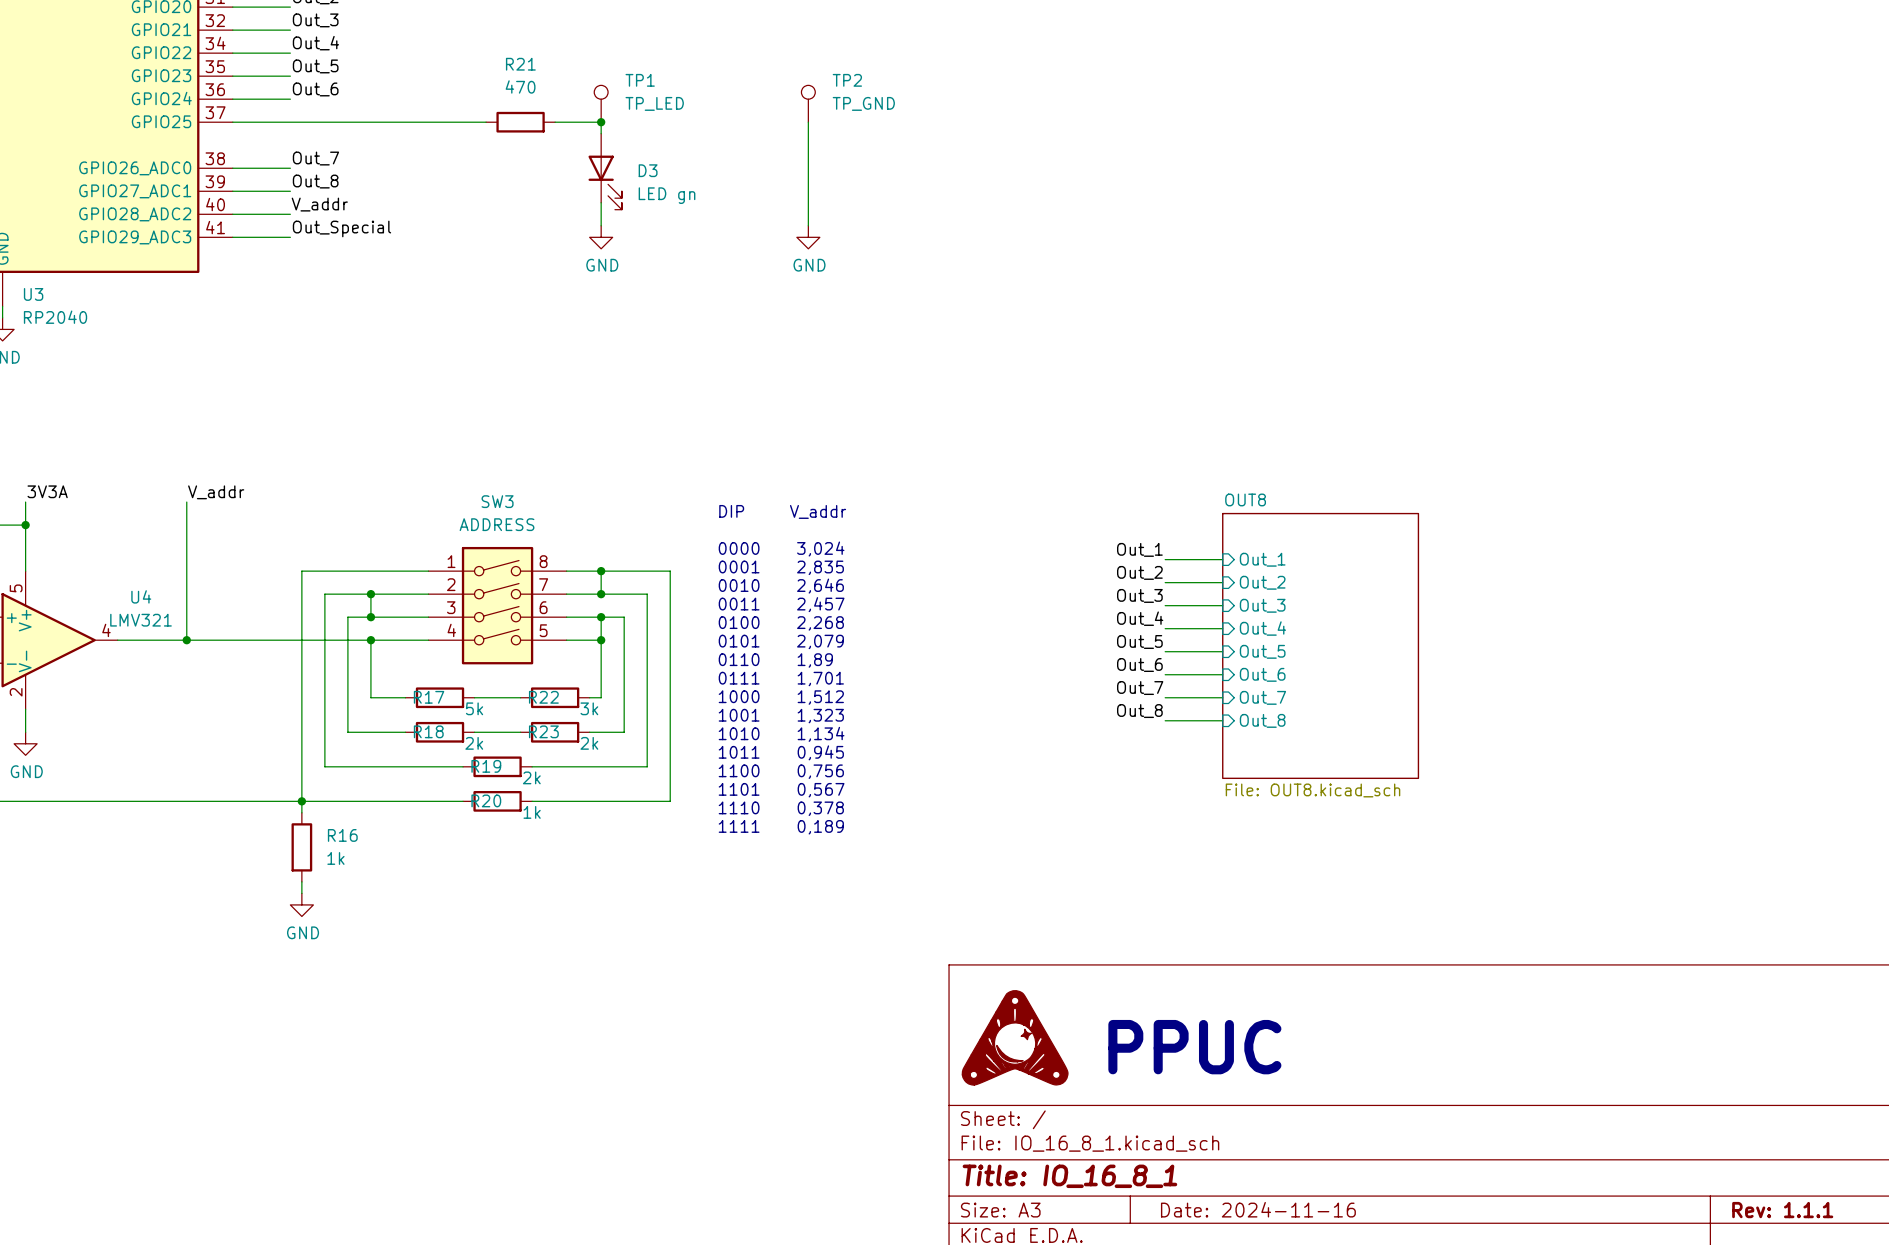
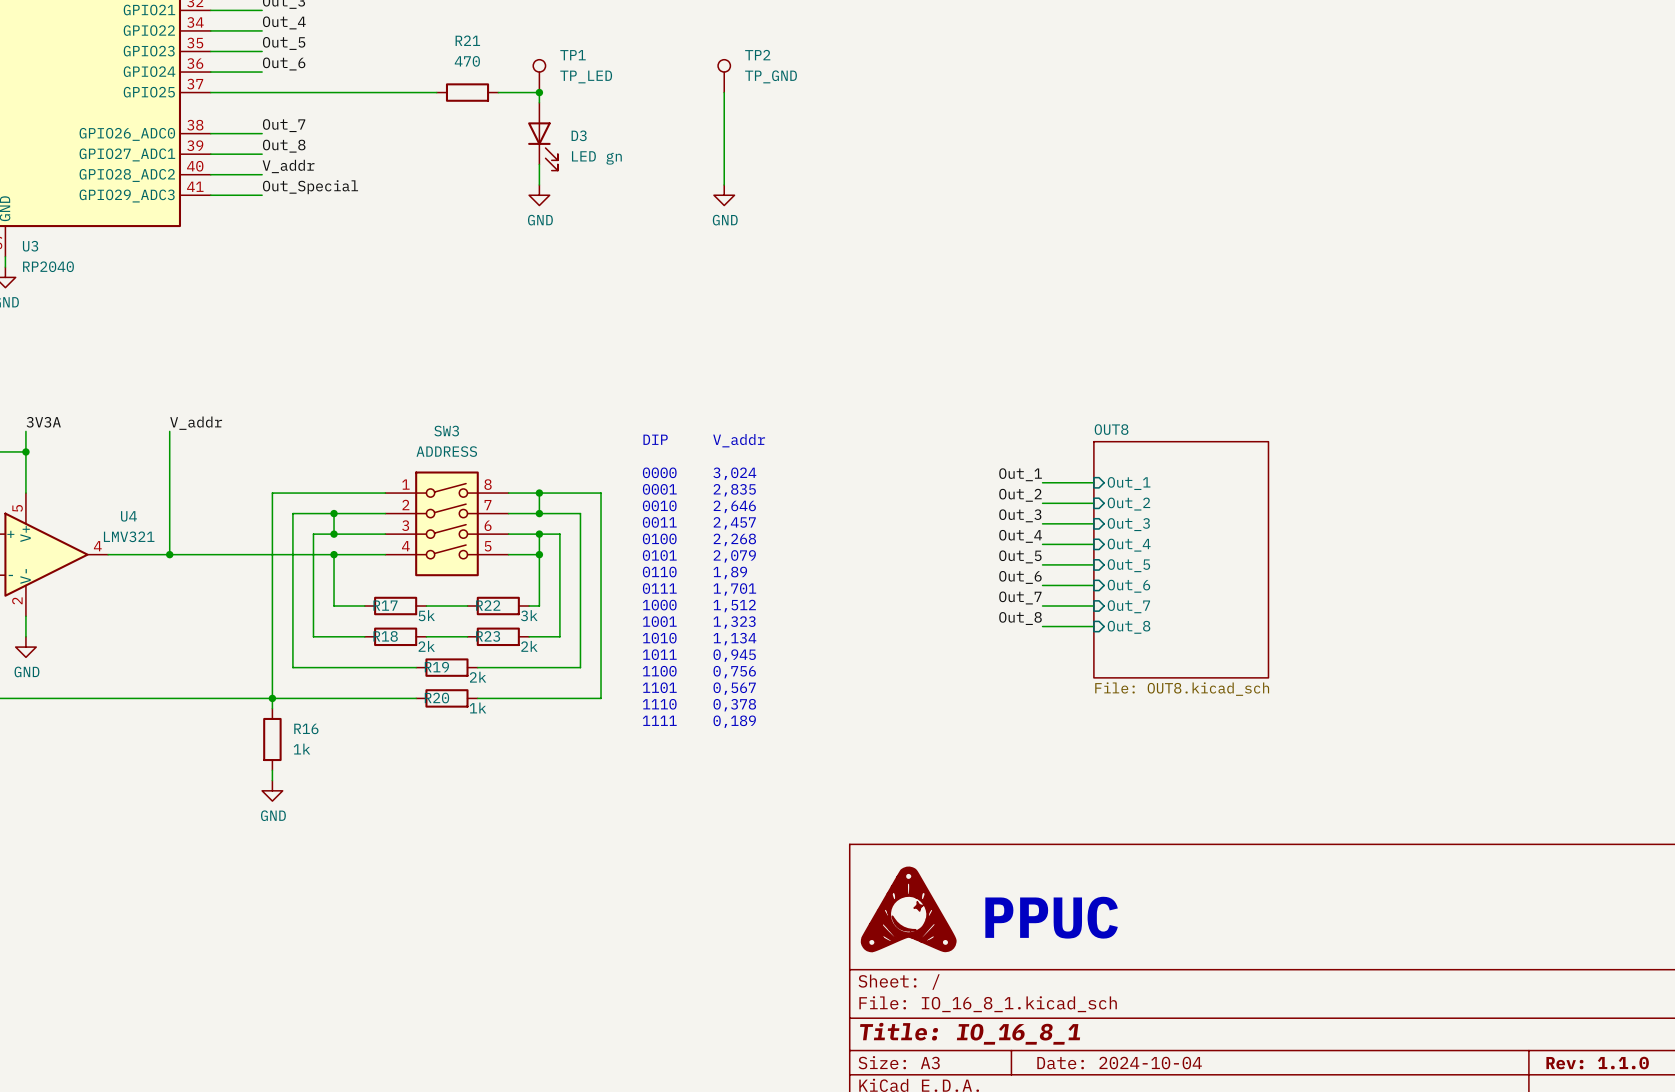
title block: Date: 2024-11-16 (1258, 1209) -> Date: 2024-10-04 (1119, 1063)
title block: Rev: 1.1.1 (1782, 1210) -> Rev: 1.1.0 (1597, 1063)

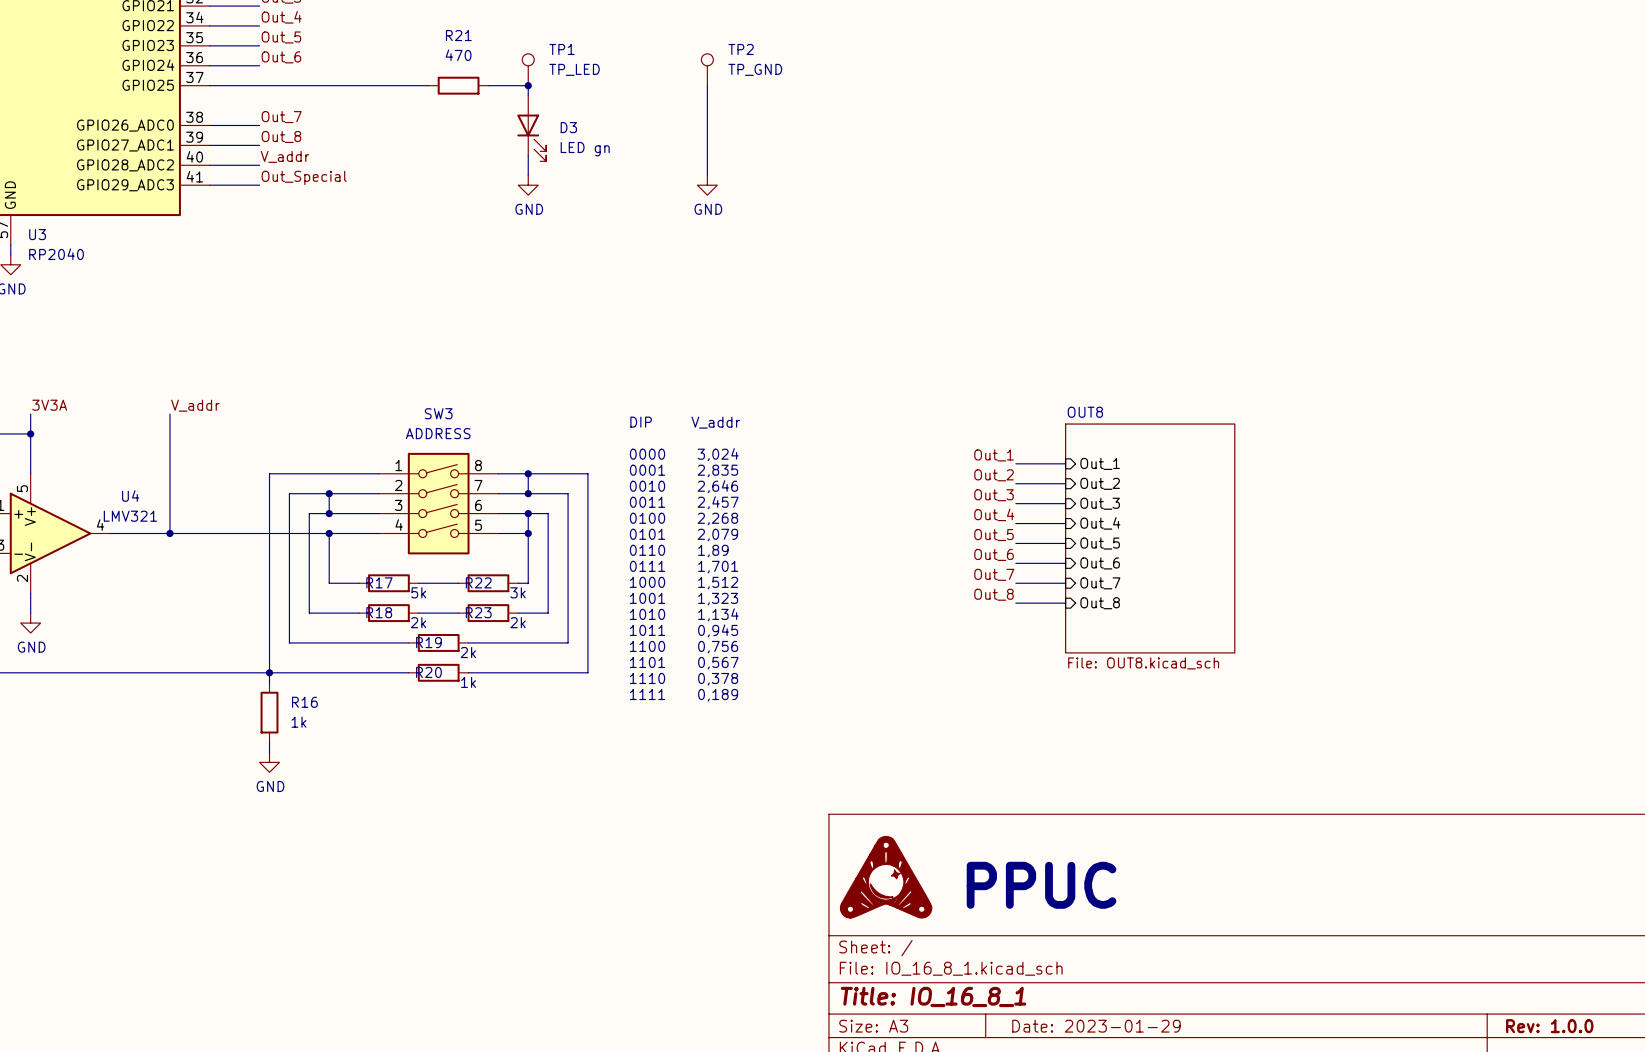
title block: Date: 2024-10-04 (1119, 1063) -> Date: 2023-01-29 (1096, 1026)
title block: Rev: 1.1.0 (1597, 1063) -> Rev: 1.0.0 (1549, 1026)

